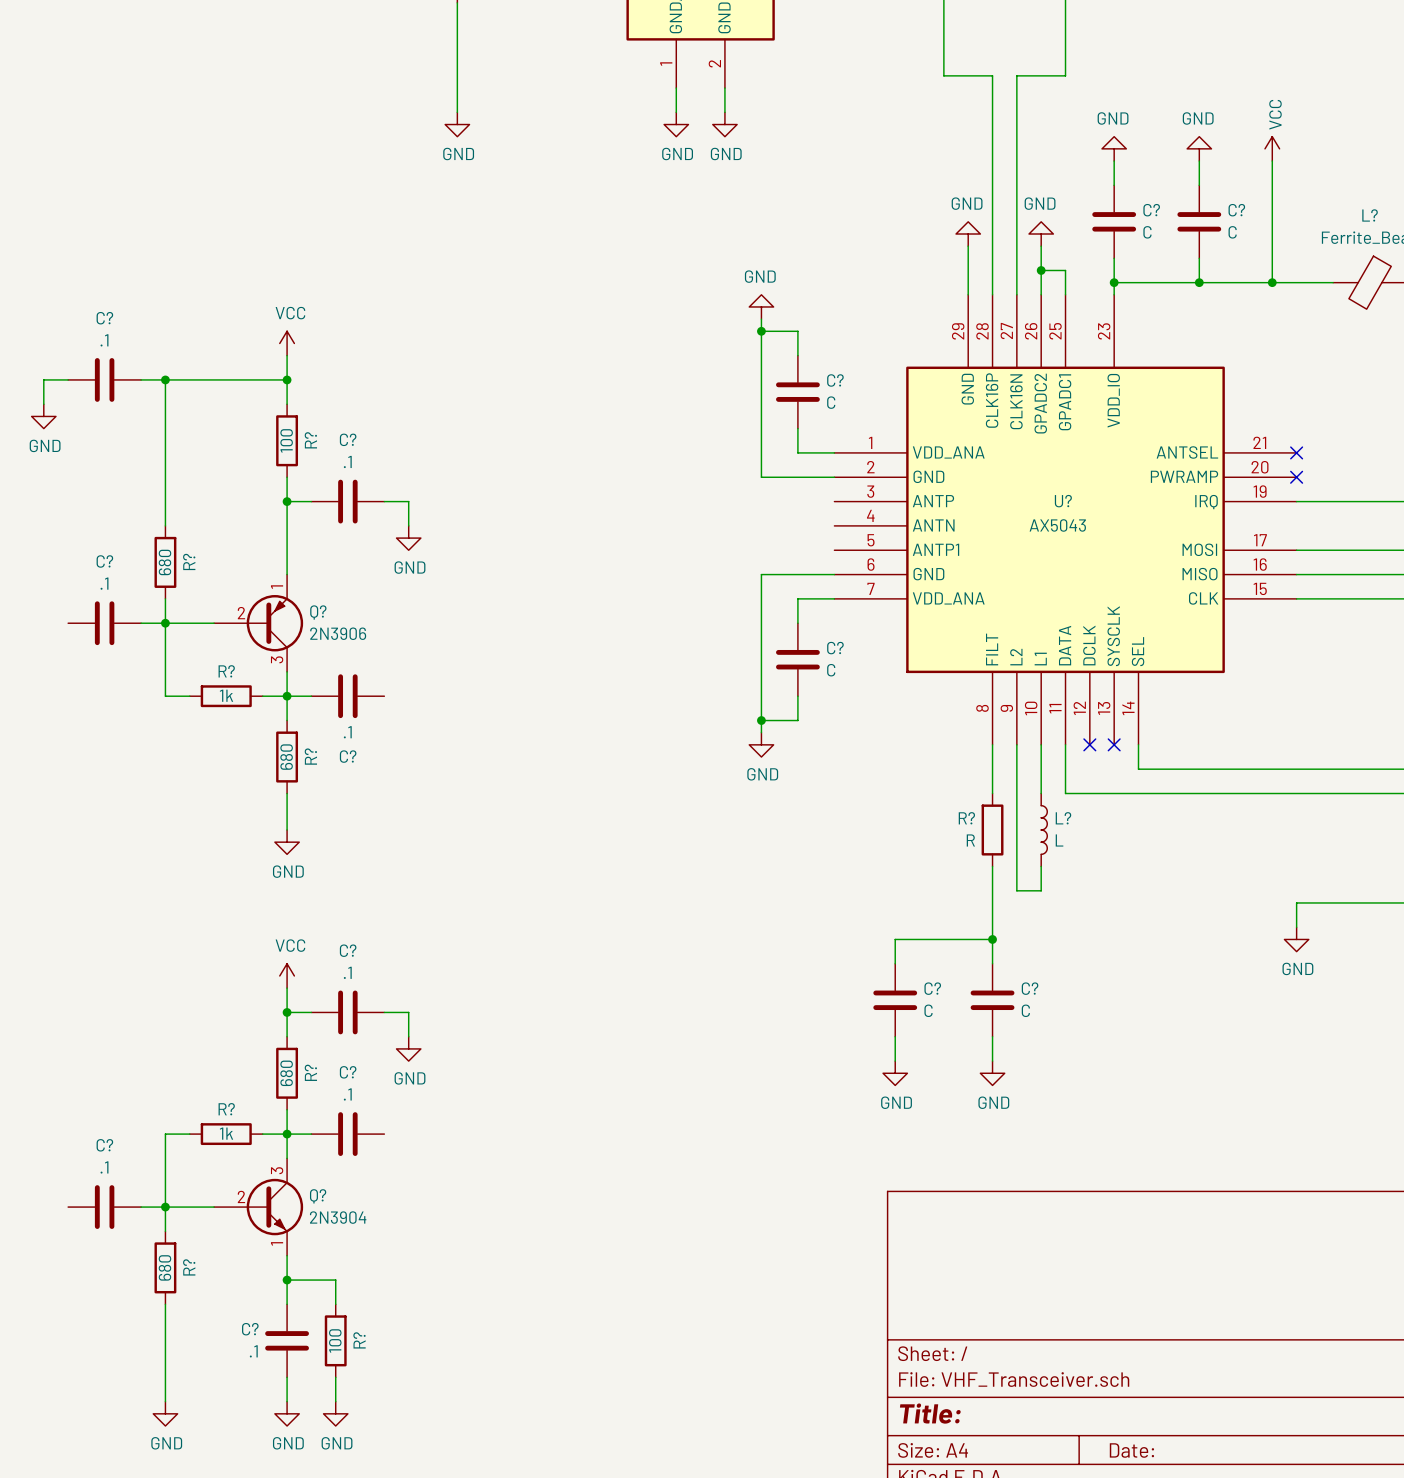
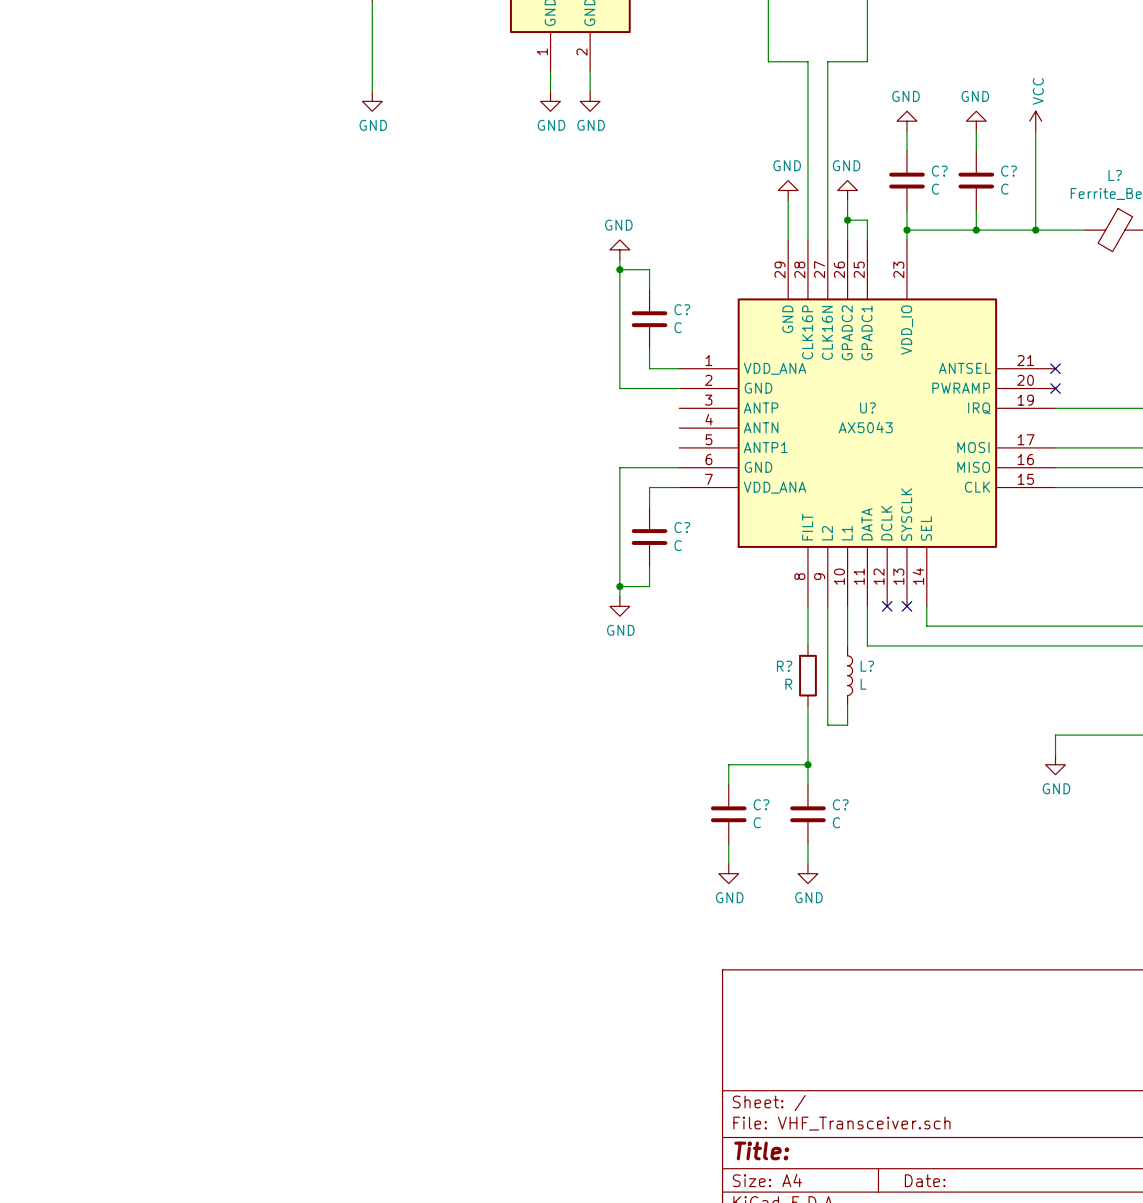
power symbol: VCC (287, 343) -> none
wire: (287, 355) (287, 404) -> none
wire: (68, 379) (43, 379) (43, 404) -> none
C?: .1 (104, 379) -> none
wire: (141, 379) (287, 379) -> none
wire: (165, 379) (165, 525) -> none
junction: (165, 379) -> none
junction: (287, 379) -> none
power symbol: GND (43, 416) -> none
R?: 100 (287, 440) -> none
wire: (287, 477) (287, 574) -> none
wire: (287, 501) (311, 501) -> none
junction: (287, 501) -> none
C?: .1 (347, 501) -> none
wire: (384, 501) (408, 501) (408, 525) -> none
power symbol: GND (408, 538) -> none
R?: 680 (165, 562) -> none
wire: (165, 598) (165, 696) (189, 696) -> none
C?: .1 (104, 623) -> none
wire: (141, 623) (214, 623) -> none
junction: (165, 623) -> none
Q?: 2N3906 (258, 623) -> none
wire: (287, 671) (287, 720) -> none
R?: 1k (226, 696) -> none
wire: (262, 696) (311, 696) -> none
junction: (287, 696) -> none
C?: .1 (347, 696) -> none
R?: 680 (287, 757) -> none
wire: (287, 793) (287, 830) -> none
power symbol: GND (287, 842) -> none
power symbol: VCC (287, 975) -> none
wire: (287, 988) (287, 1036) -> none
wire: (287, 1012) (311, 1012) -> none
junction: (287, 1012) -> none
C?: .1 (347, 1012) -> none
wire: (384, 1012) (408, 1012) (408, 1036) -> none
power symbol: GND (408, 1048) -> none
R?: 680 (287, 1073) -> none
wire: (287, 1109) (287, 1158) -> none
wire: (189, 1134) (165, 1134) (165, 1231) -> none
R?: 1k (226, 1134) -> none
wire: (262, 1134) (311, 1134) -> none
junction: (287, 1134) -> none
C?: .1 (347, 1134) -> none
C?: .1 (104, 1207) -> none
wire: (141, 1207) (214, 1207) -> none
junction: (165, 1207) -> none
Q?: 2N3904 (258, 1207) -> none
wire: (287, 1255) (287, 1304) -> none
R?: 680 (165, 1267) -> none
wire: (287, 1280) (335, 1280) (335, 1304) -> none
junction: (287, 1280) -> none
wire: (165, 1304) (165, 1401) -> none
C?: .1 (287, 1340) -> none
R?: 100 (335, 1340) -> none
wire: (287, 1377) (287, 1401) -> none
wire: (335, 1377) (335, 1401) -> none
power symbol: GND (165, 1413) -> none
power symbol: GND (287, 1413) -> none
power symbol: GND (335, 1413) -> none

